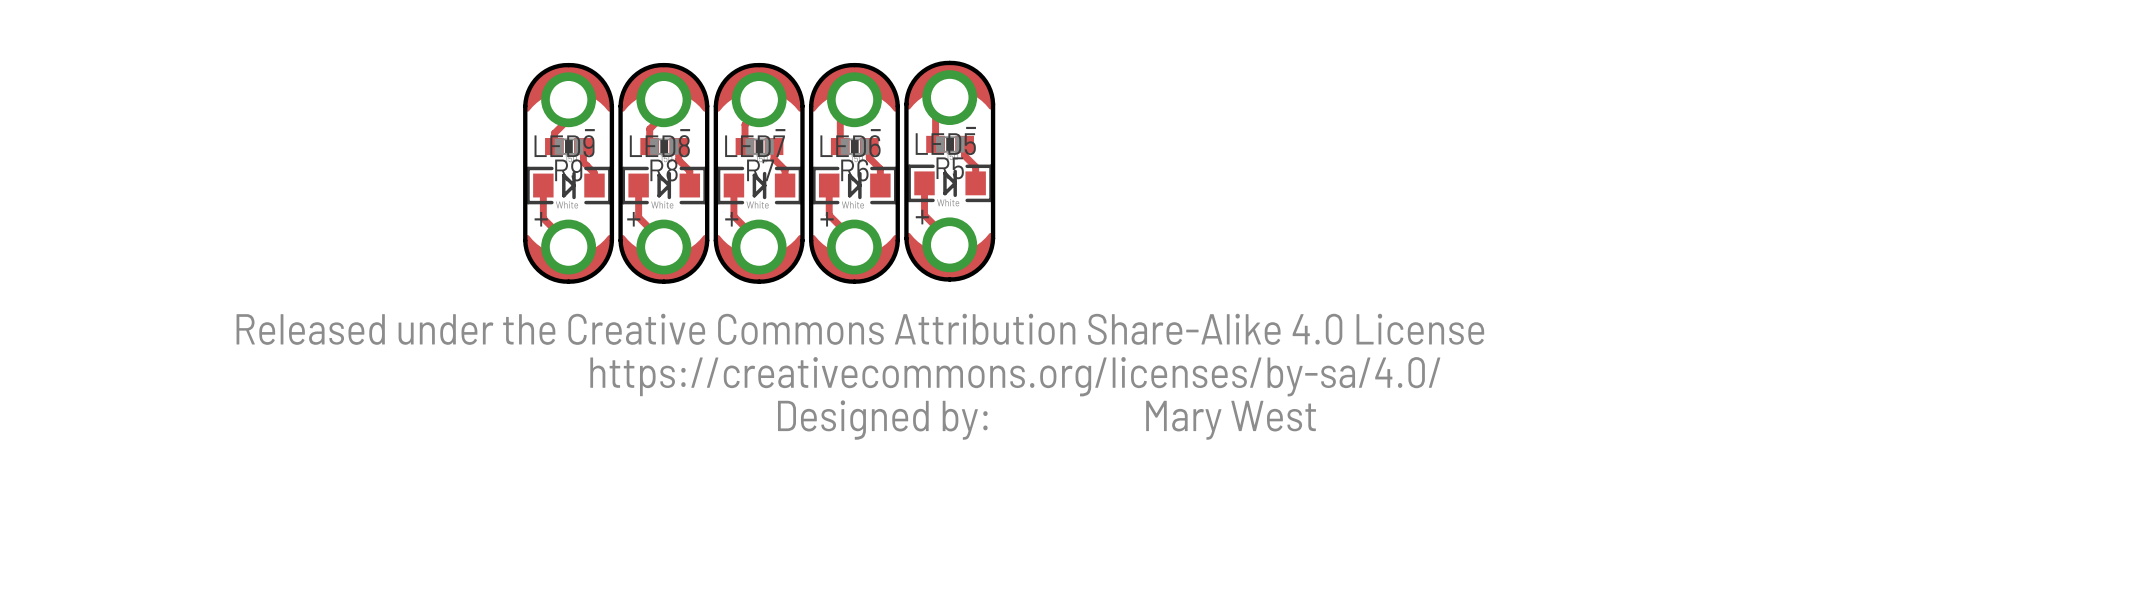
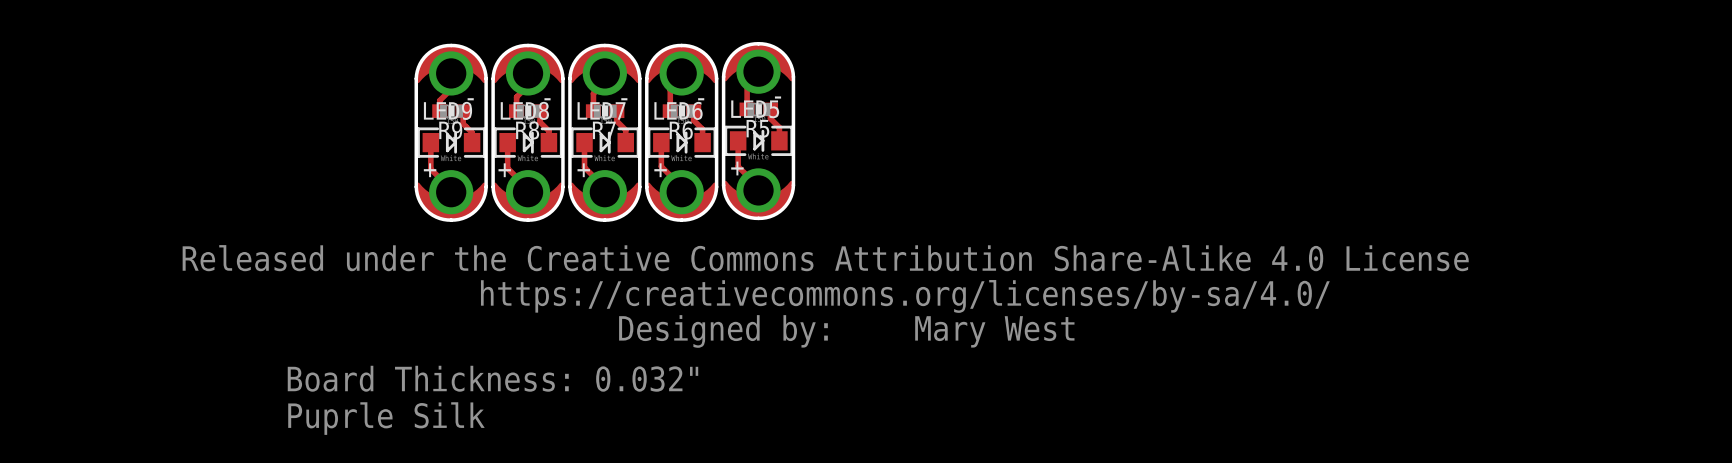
text: none -> Board Thickness: 0.032" (492, 378)
text: none -> Puprle Silk (386, 418)

